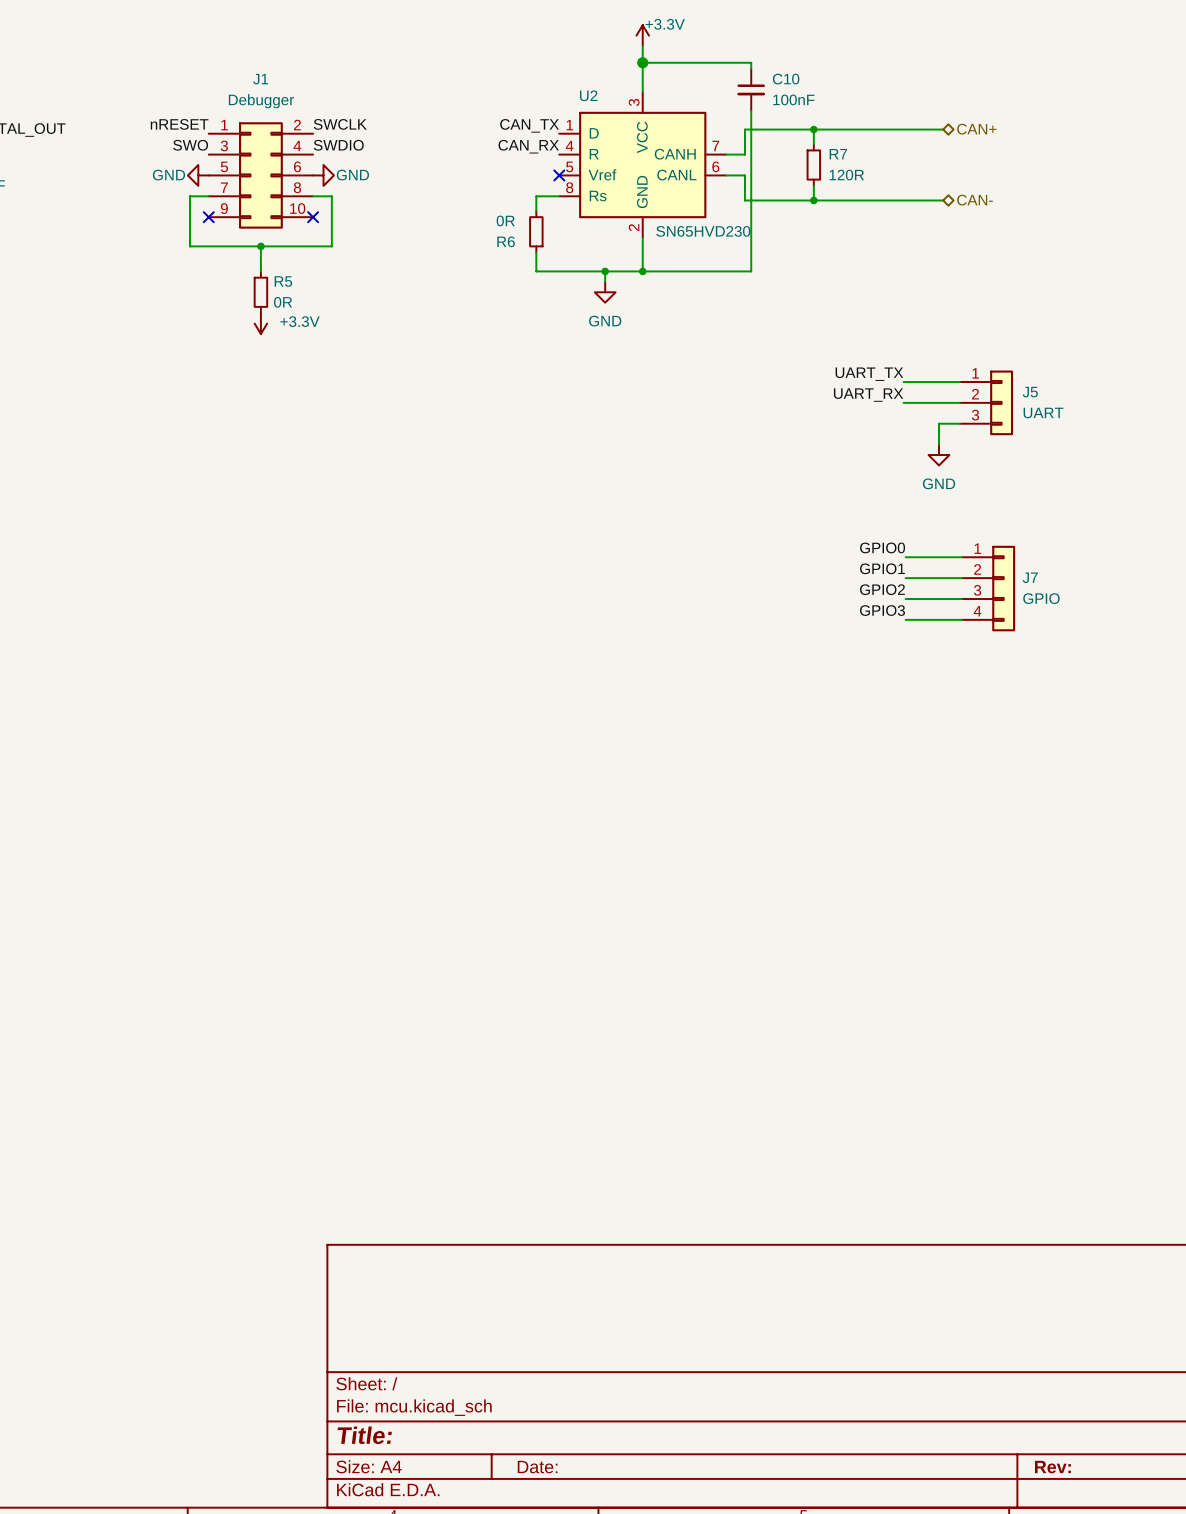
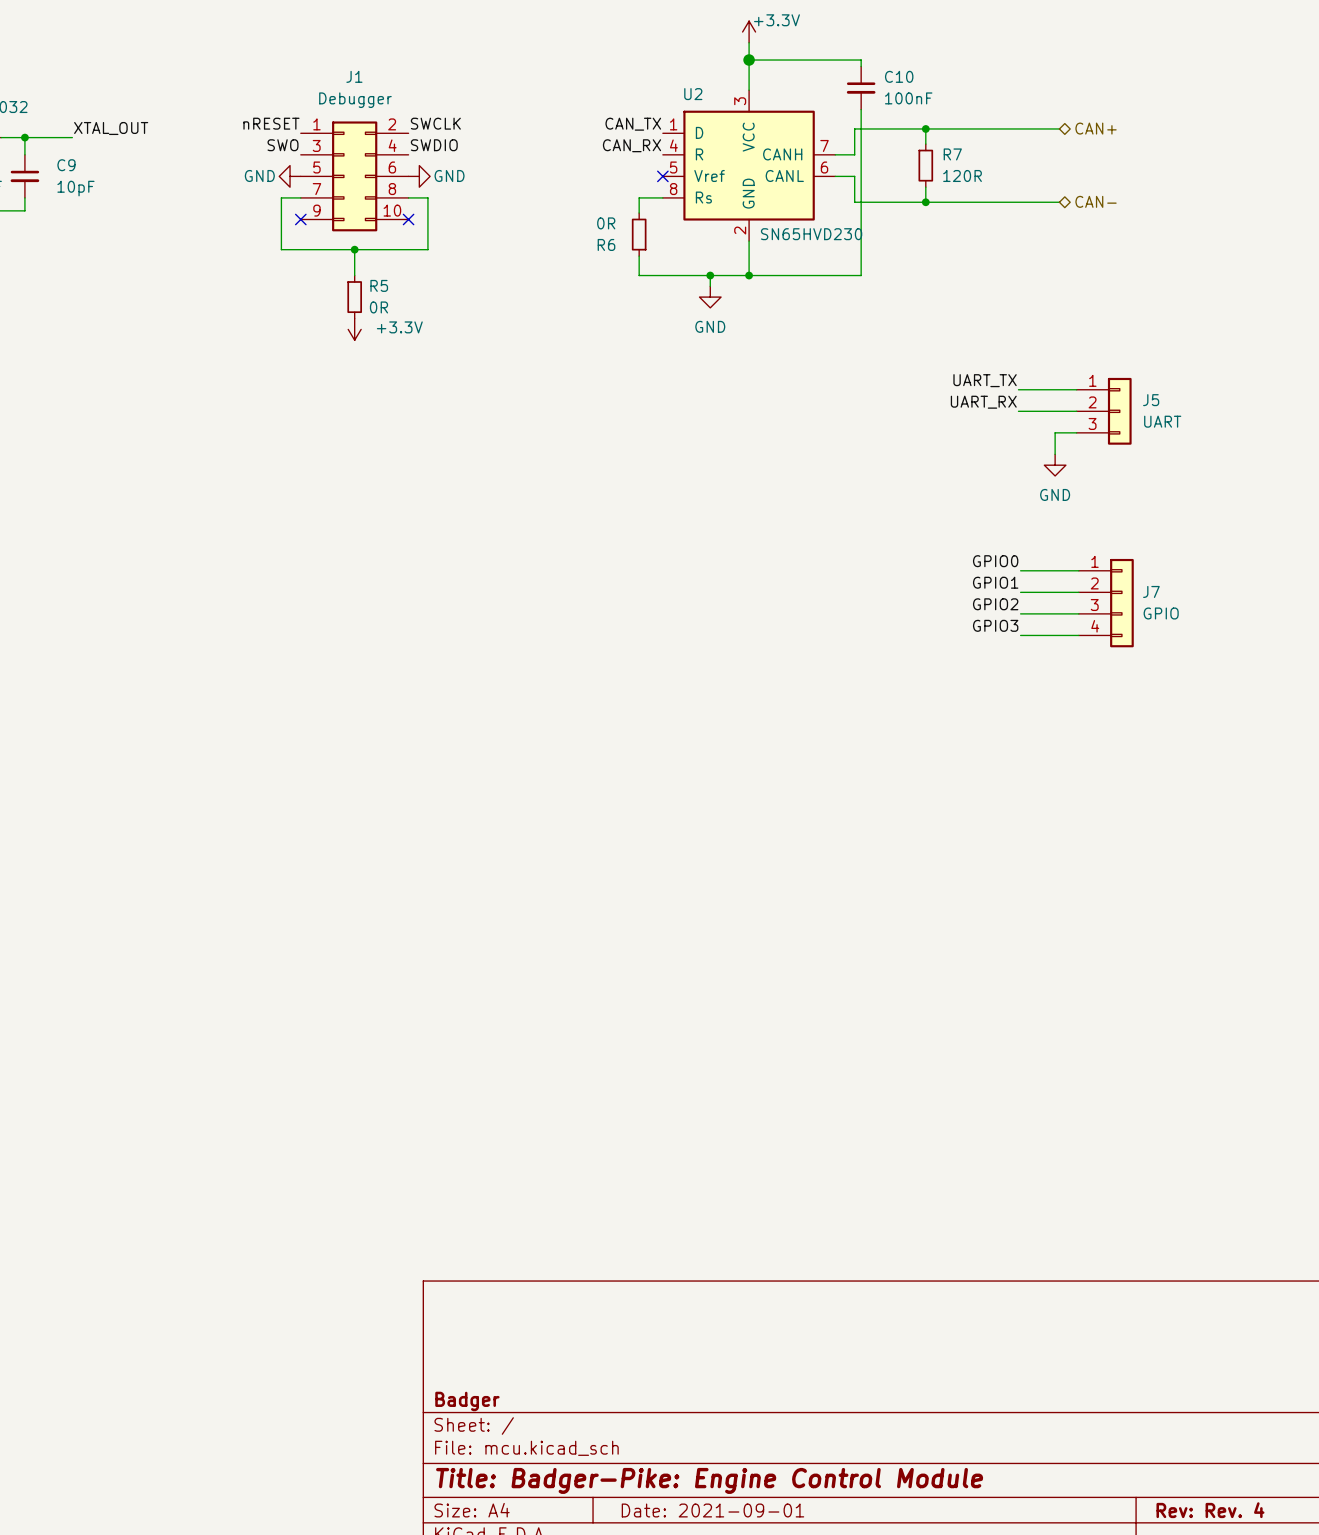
title block: none -> Badger (467, 1401)
title block: Title: (364, 1435) -> Title: Badger-Pike: Engine Control Module (709, 1480)
title block: Date: (537, 1467) -> Date: 2021-09-01 (712, 1510)
title block: Rev: (1052, 1467) -> Rev: Rev. 4 (1210, 1510)

